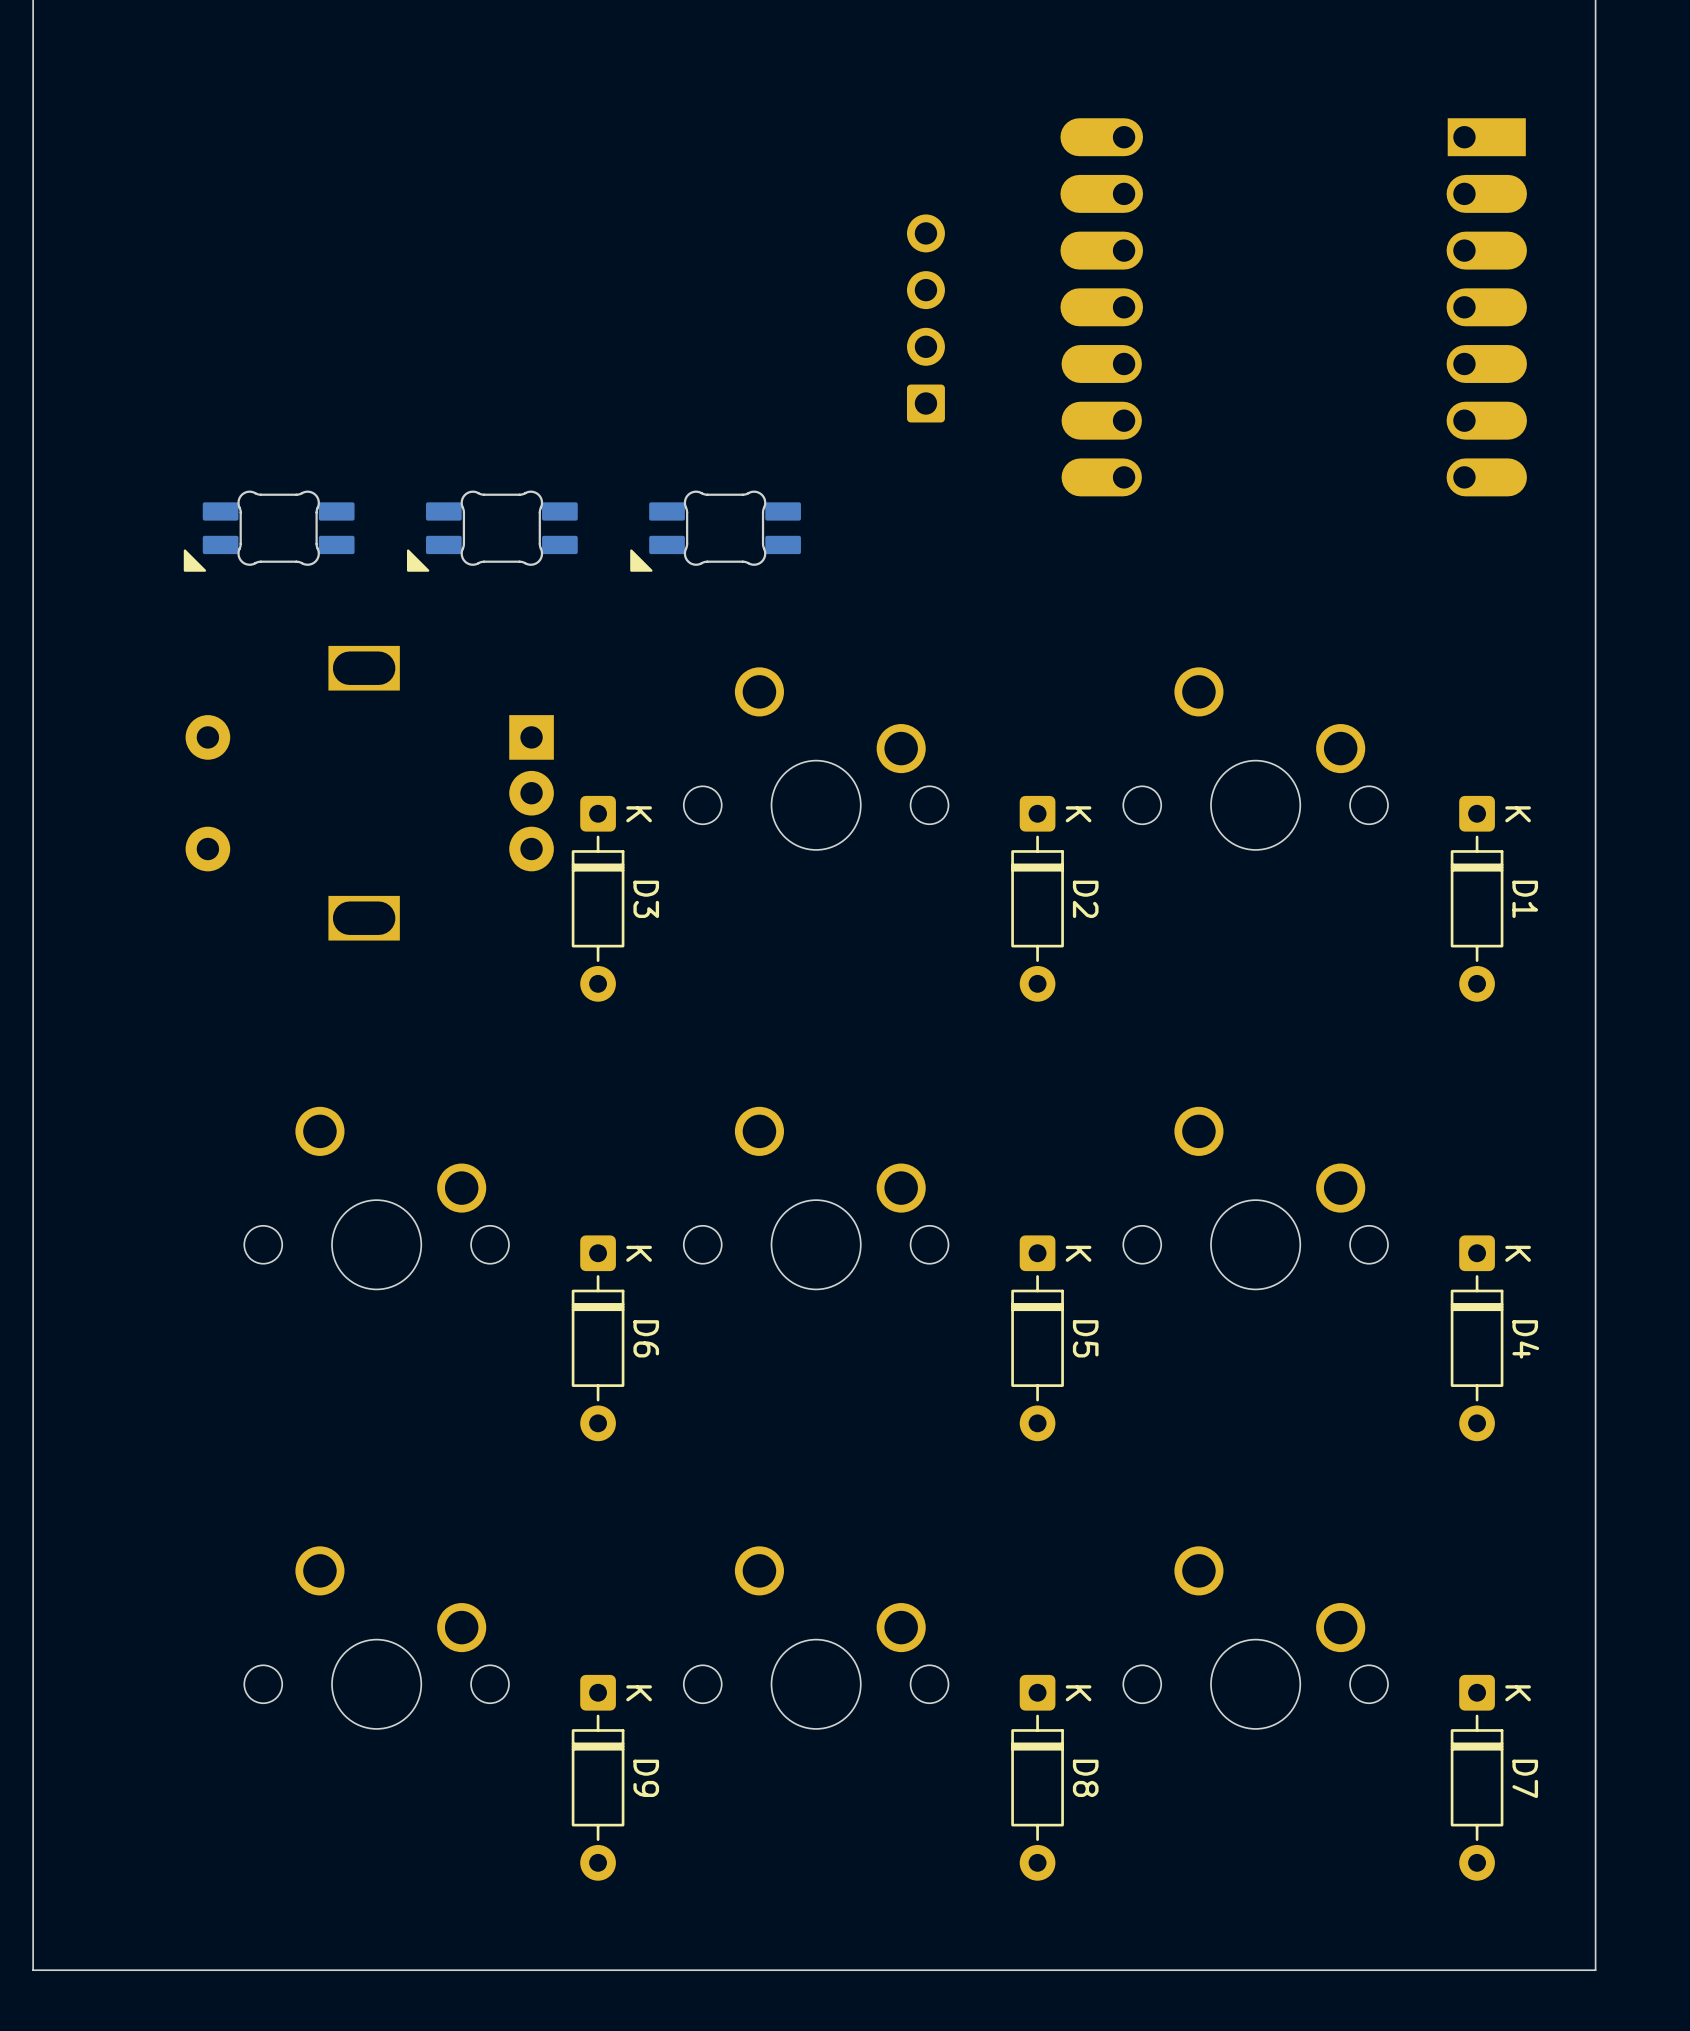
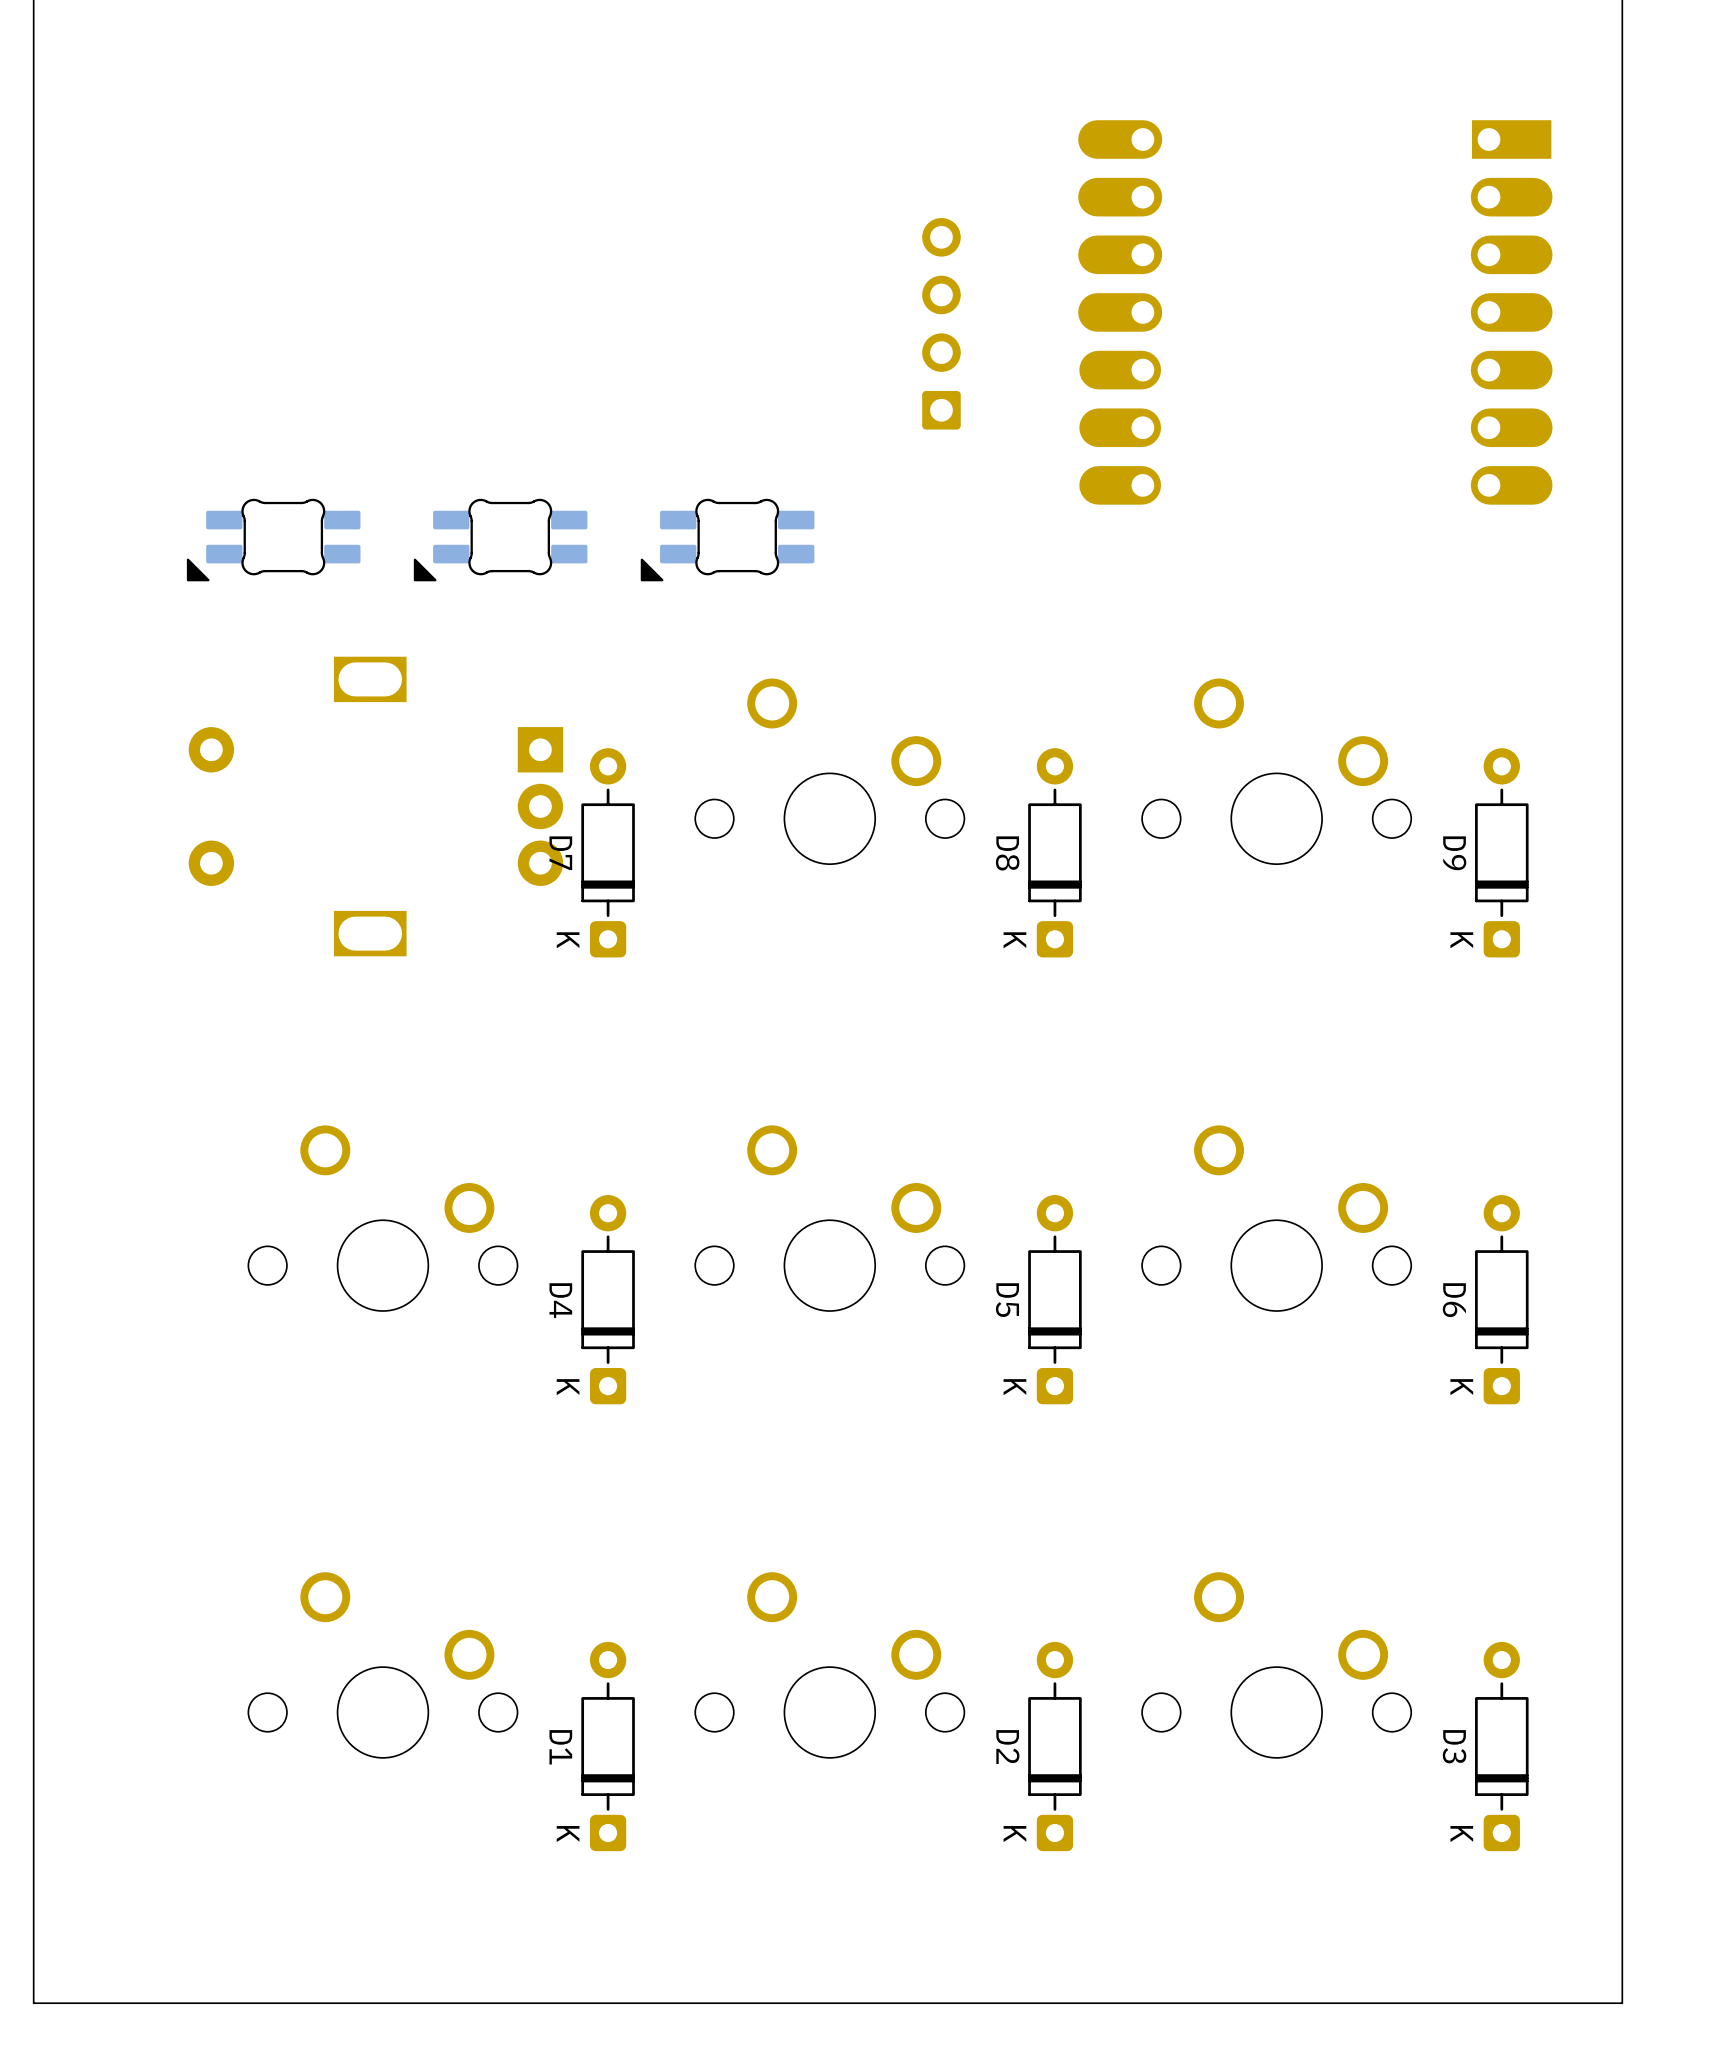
D3 rotation: 0° (598, 898) -> 180° (1501, 1746)
D3 position: (598, 898) -> (1501, 1746)
D2 rotation: 0° (1037, 898) -> 180° (1054, 1746)
D2 position: (1037, 898) -> (1054, 1746)
D1 rotation: 0° (1477, 898) -> 180° (608, 1746)
D1 position: (1477, 898) -> (608, 1746)
D6 rotation: 0° (598, 1338) -> 180° (1501, 1299)
D6 position: (598, 1338) -> (1501, 1299)
D5 rotation: 0° (1037, 1338) -> 180° (1054, 1299)
D4 rotation: 0° (1477, 1338) -> 180° (608, 1299)
D4 position: (1477, 1338) -> (608, 1299)
D9 rotation: 0° (598, 1777) -> 180° (1501, 852)
D9 position: (598, 1777) -> (1501, 852)
D8 rotation: 0° (1037, 1777) -> 180° (1054, 852)
D8 position: (1037, 1777) -> (1054, 852)
D7 rotation: 0° (1477, 1777) -> 180° (608, 852)
D7 position: (1477, 1777) -> (608, 852)

